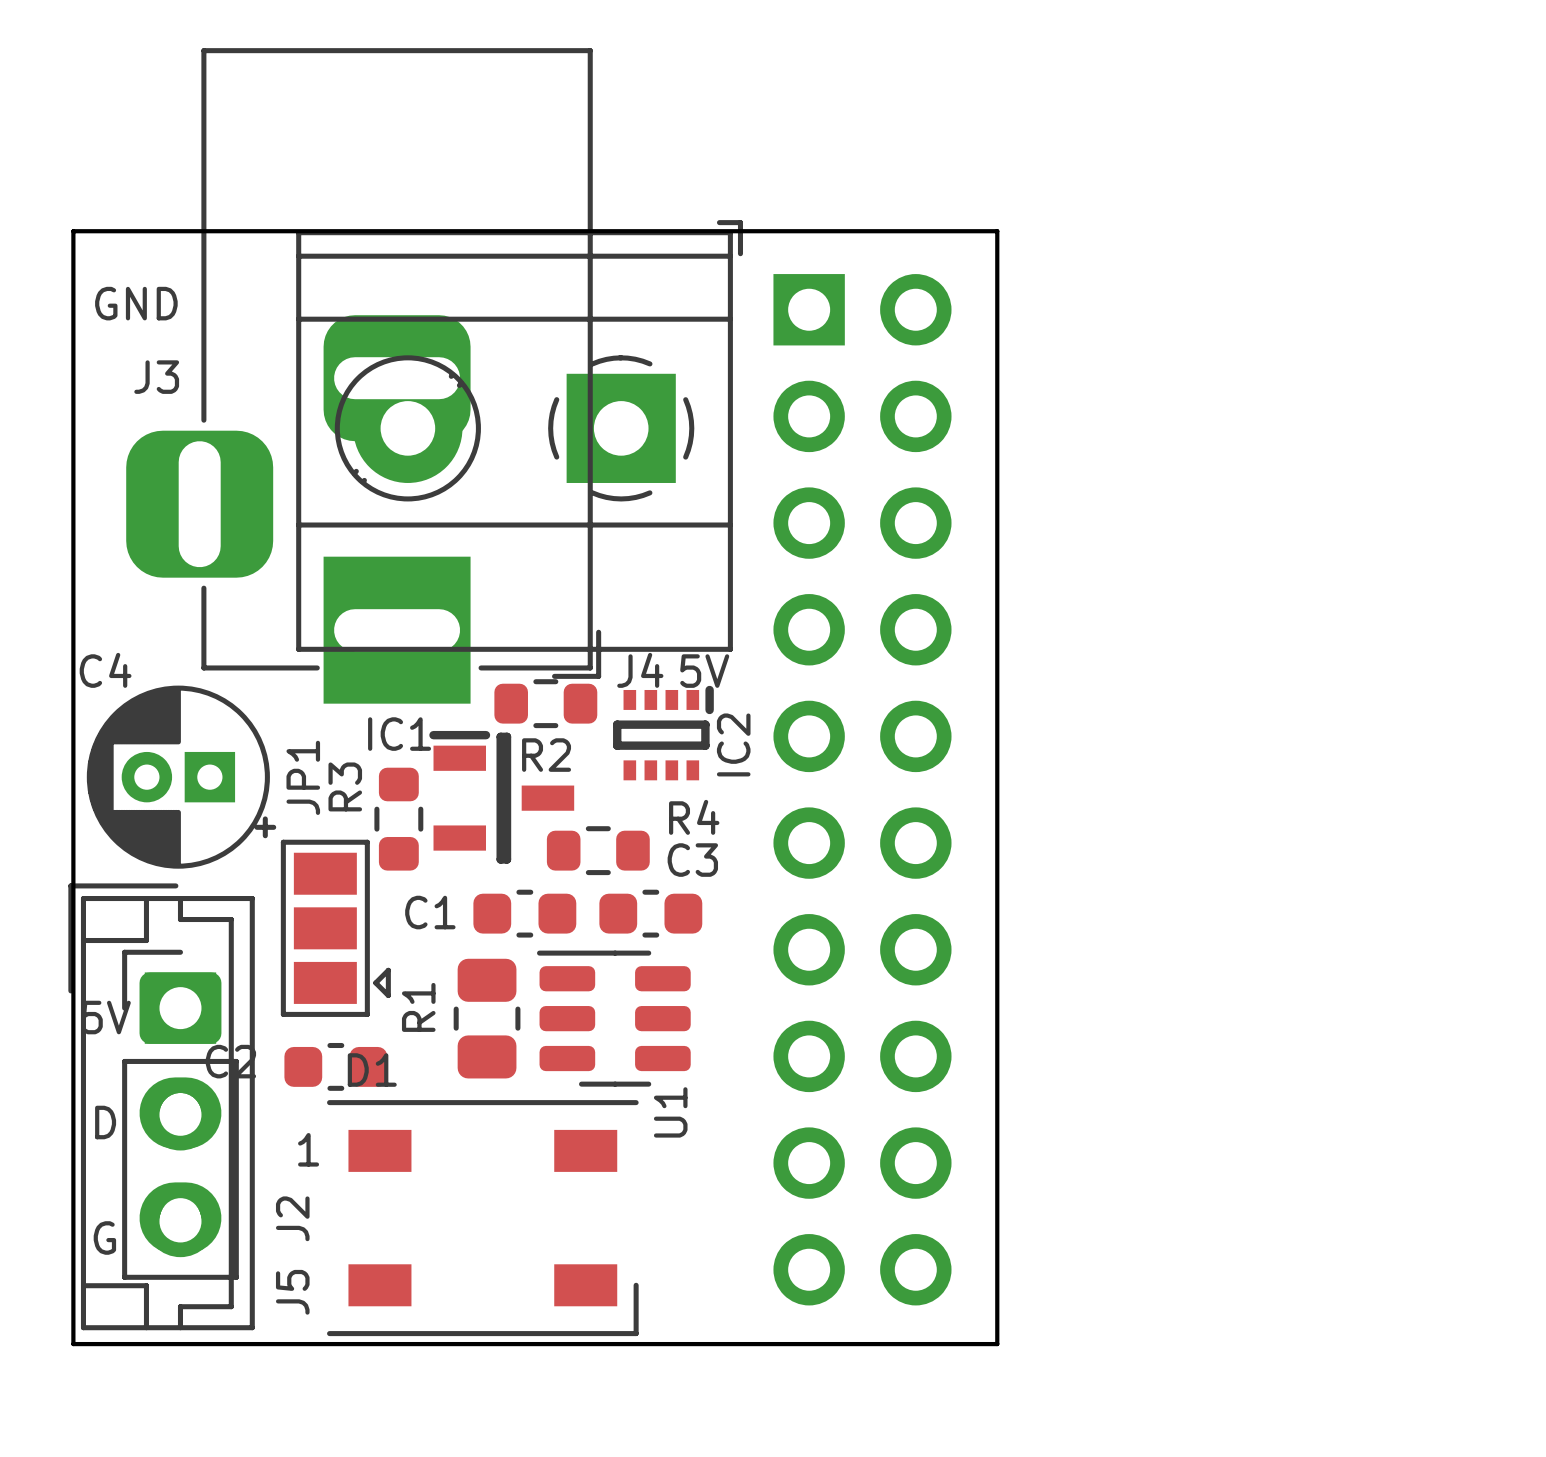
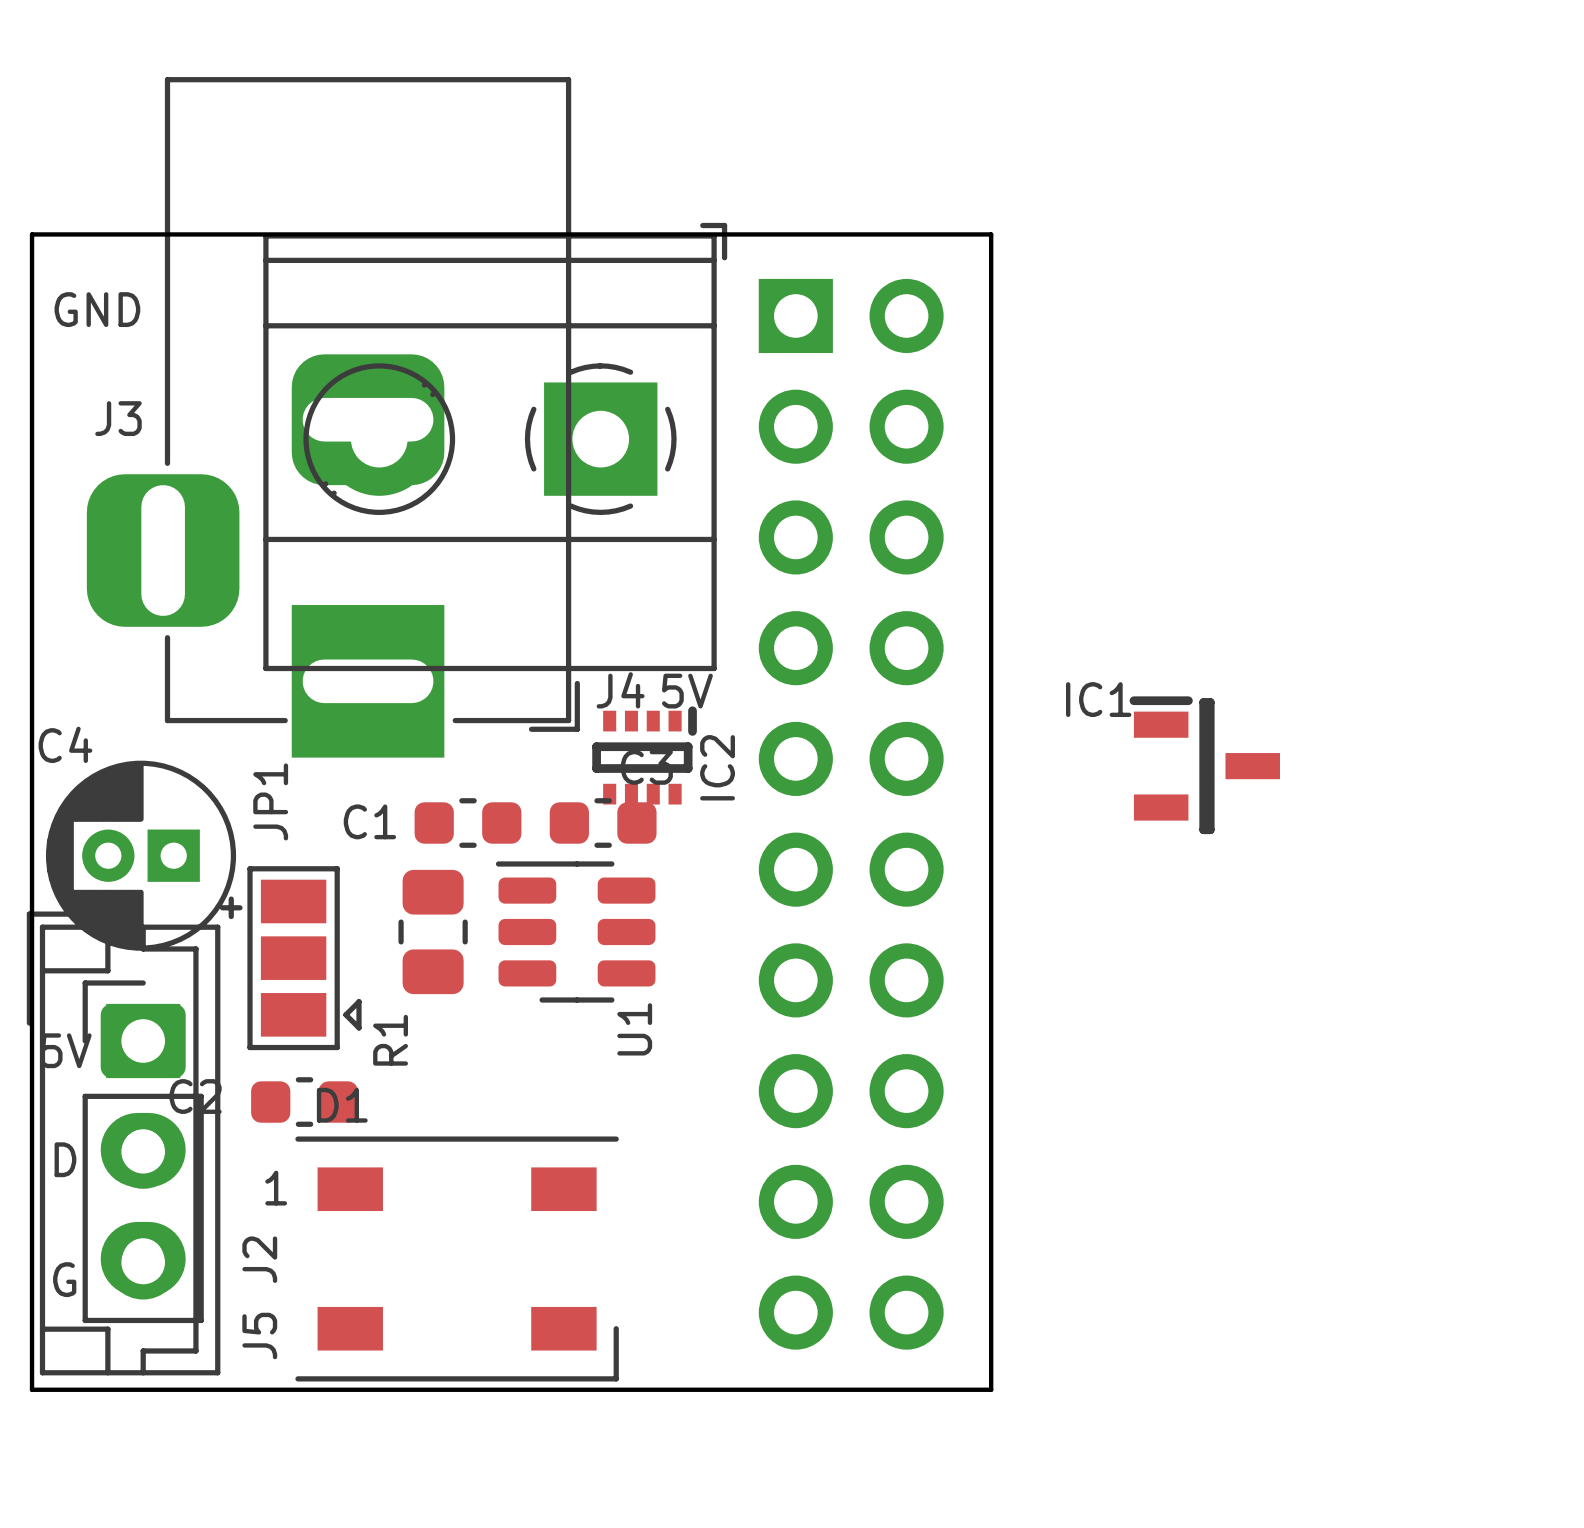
J3 position: (363, 375) -> (333, 417)
R2: (545, 703) -> none
C4 position: (181, 777) -> (144, 855)
IC1 position: (501, 797) -> (1204, 765)
R3: (398, 819) -> none
R4: (598, 850) -> none
C1 position: (524, 913) -> (467, 823)
C3 position: (650, 913) -> (603, 823)
R1 position: (487, 1018) -> (433, 932)
U1 position: (613, 1018) -> (575, 932)

